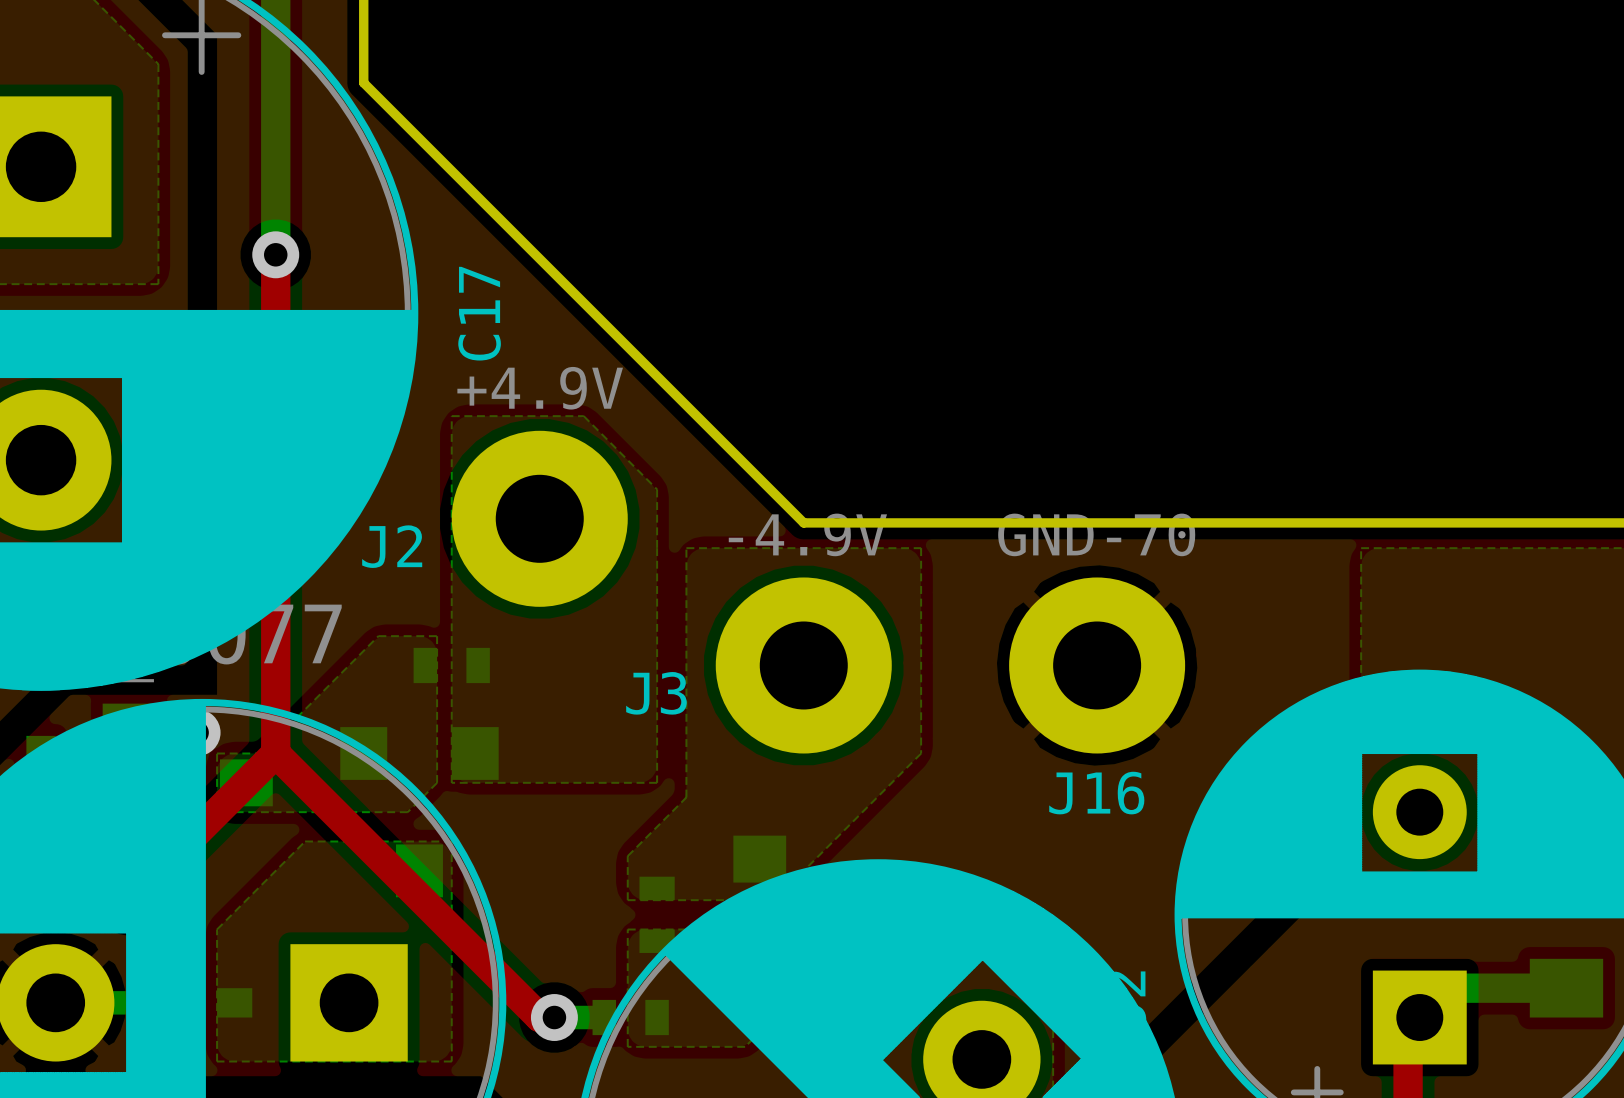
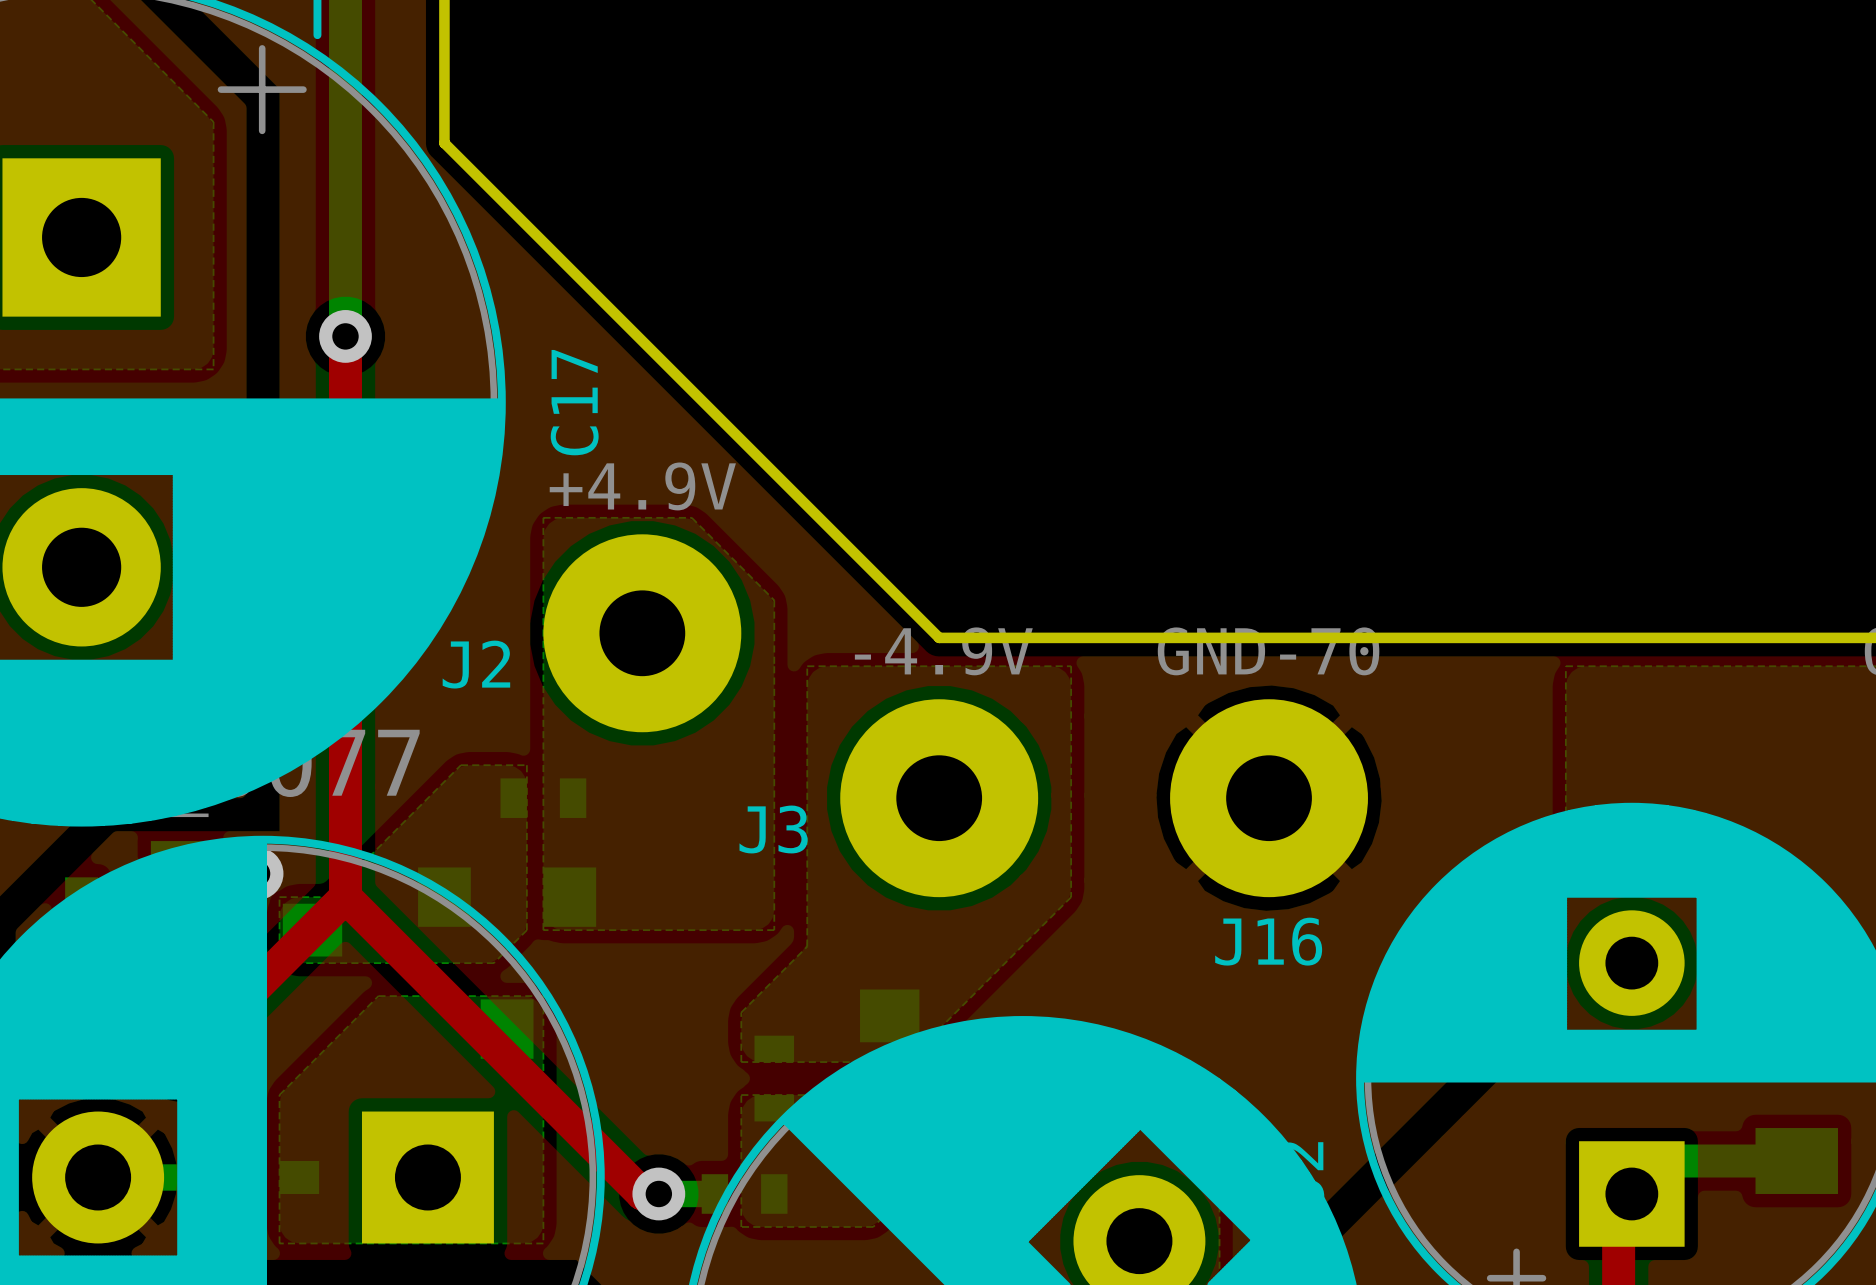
J2 footprint: [451, 430, 628, 607] -> [543, 534, 742, 733]
J3 footprint: [715, 577, 892, 754] -> [840, 699, 1039, 898]
J16 footprint: [1009, 577, 1186, 754] -> [1170, 699, 1368, 898]

